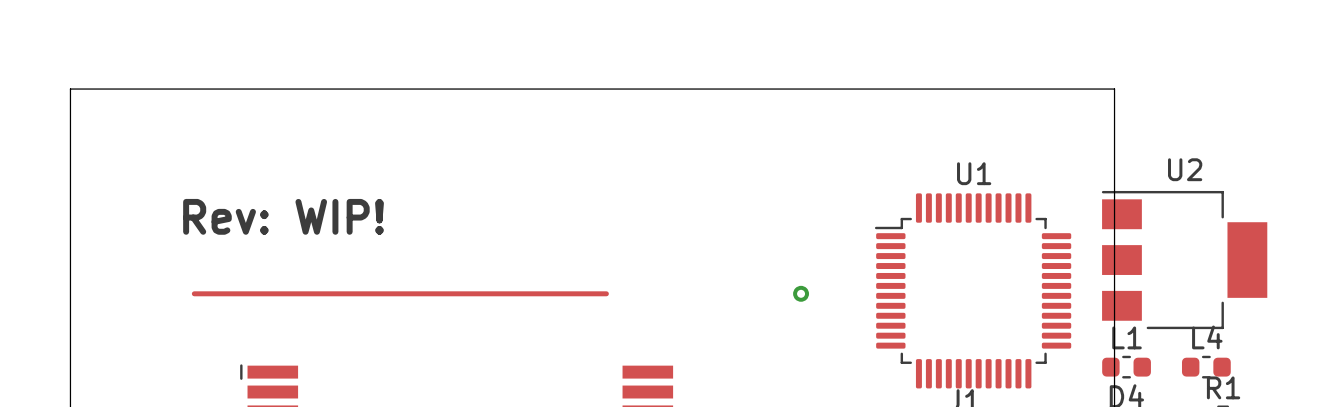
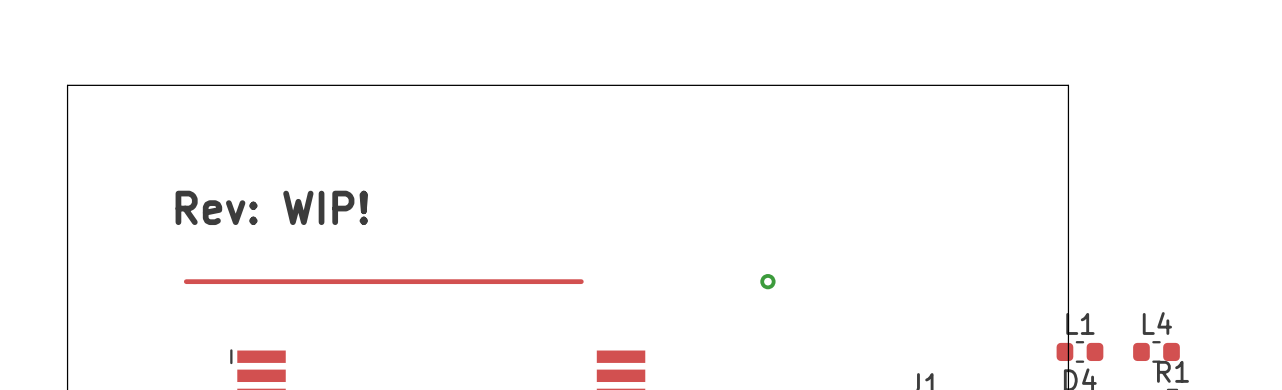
U2: (1184, 260) -> none
U1: (973, 290) -> none

